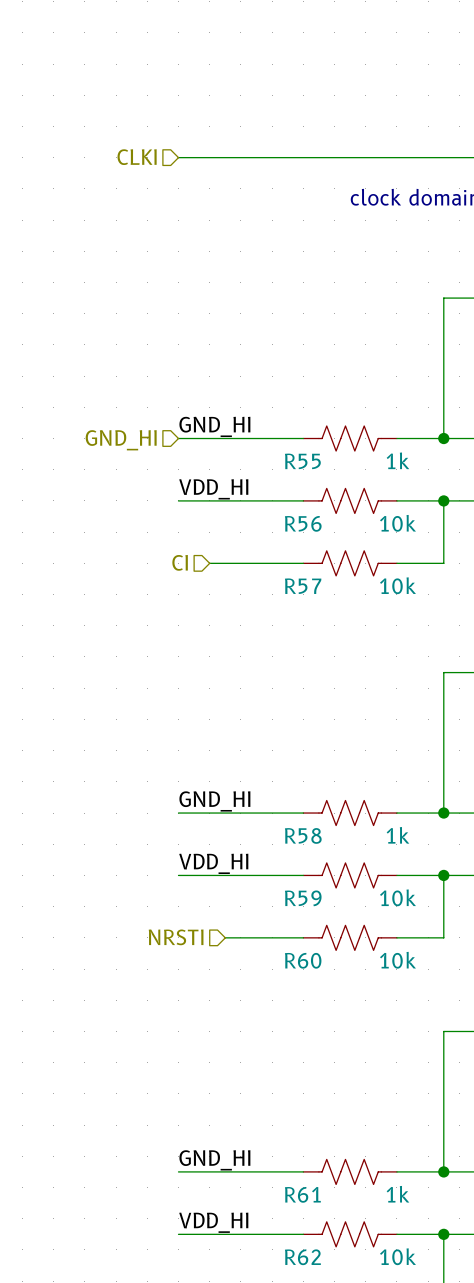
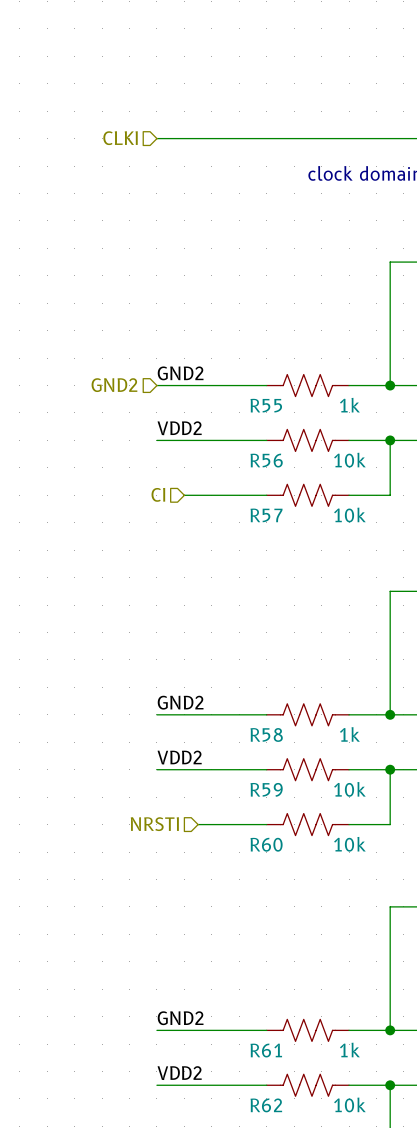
label: GND_HI (214, 426) -> GND2 (180, 373)
hierarchical label: GND_HI (121, 440) -> GND2 (114, 385)
label: VDD_HI (213, 489) -> VDD2 (179, 428)
label: GND_HI (214, 801) -> GND2 (180, 702)
label: VDD_HI (213, 863) -> VDD2 (179, 757)
label: GND_HI (214, 1160) -> GND2 (180, 1018)
label: VDD_HI (213, 1222) -> VDD2 (179, 1073)

